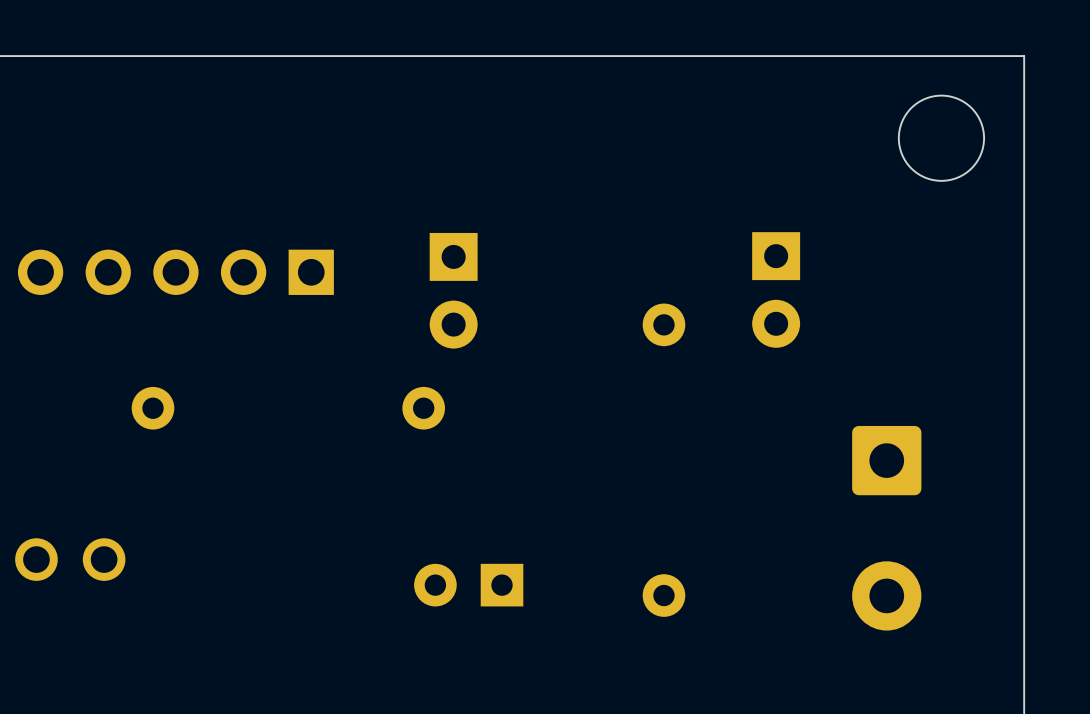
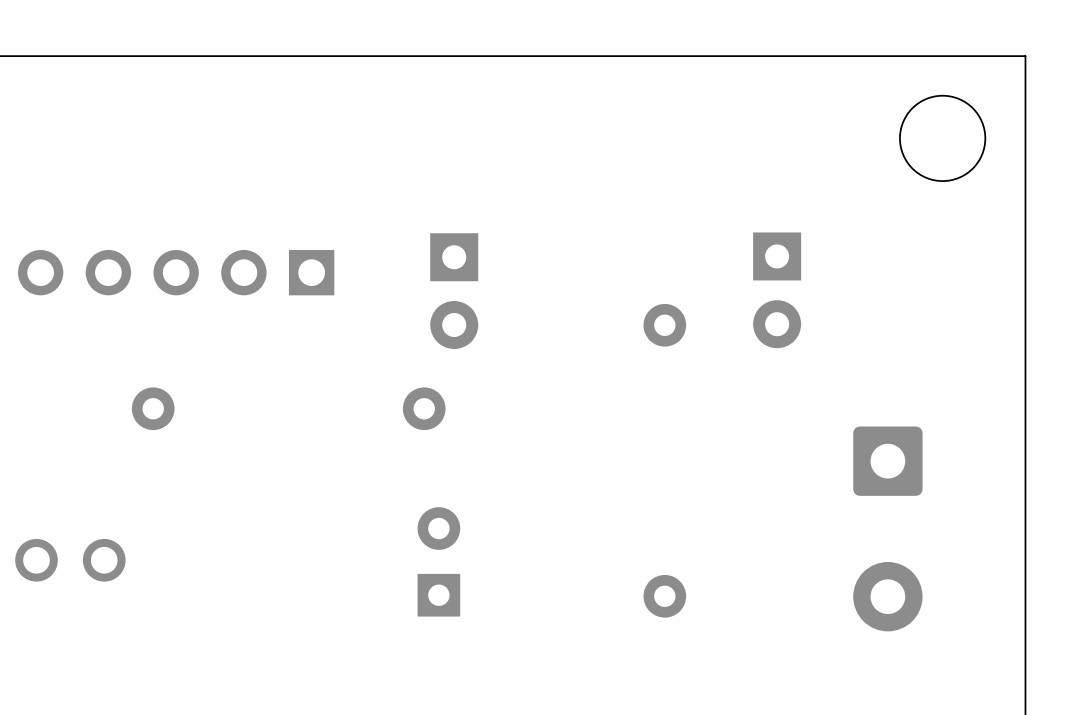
part rotation: 0° (468, 585) -> 90° clockwise (438, 561)

